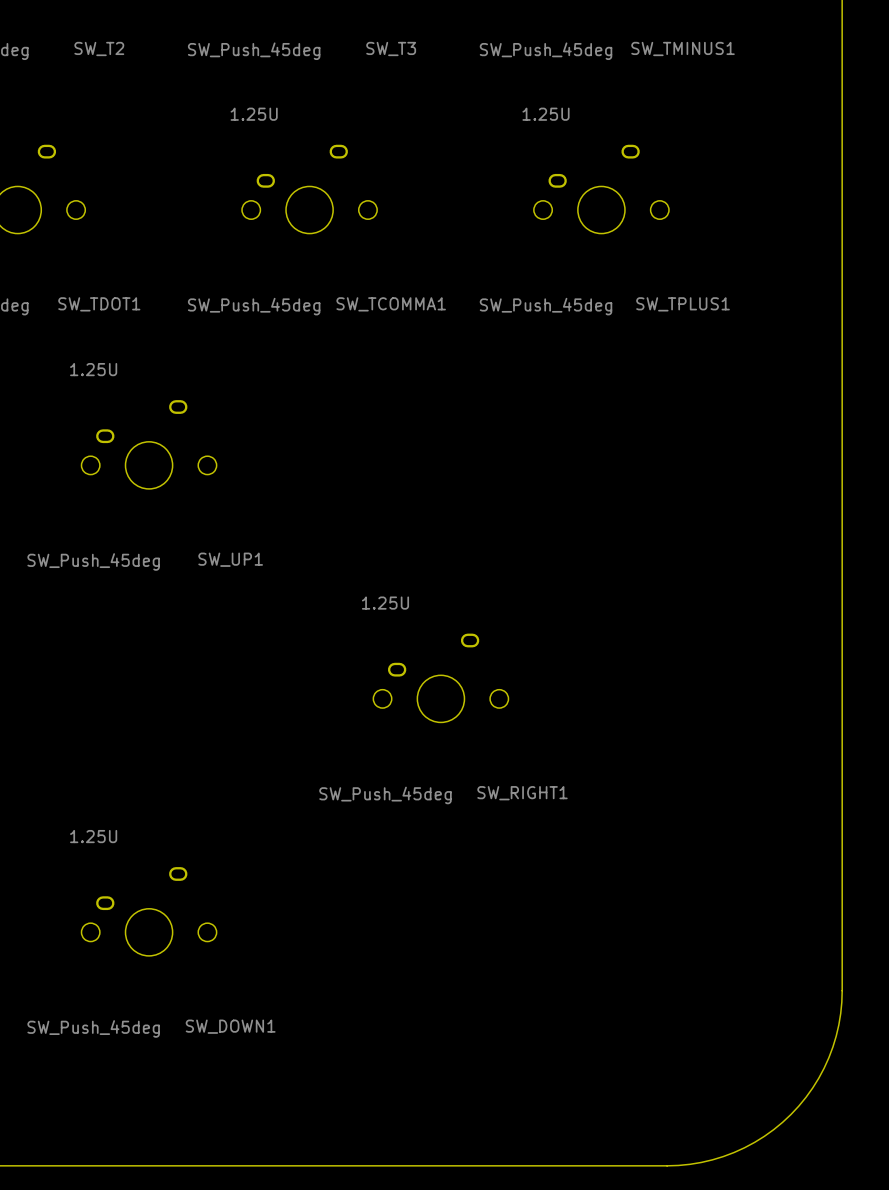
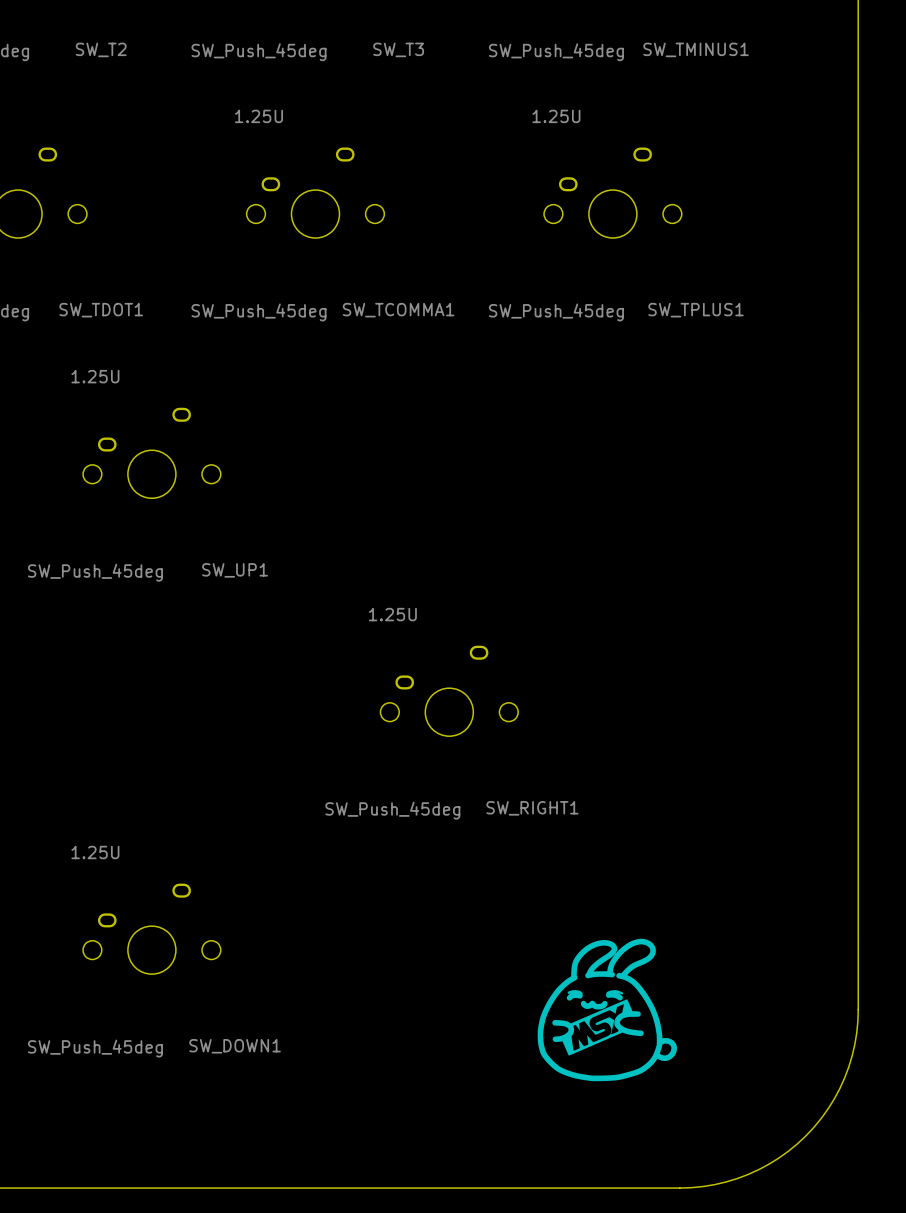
drawing: none -> [537, 938, 677, 1082]

